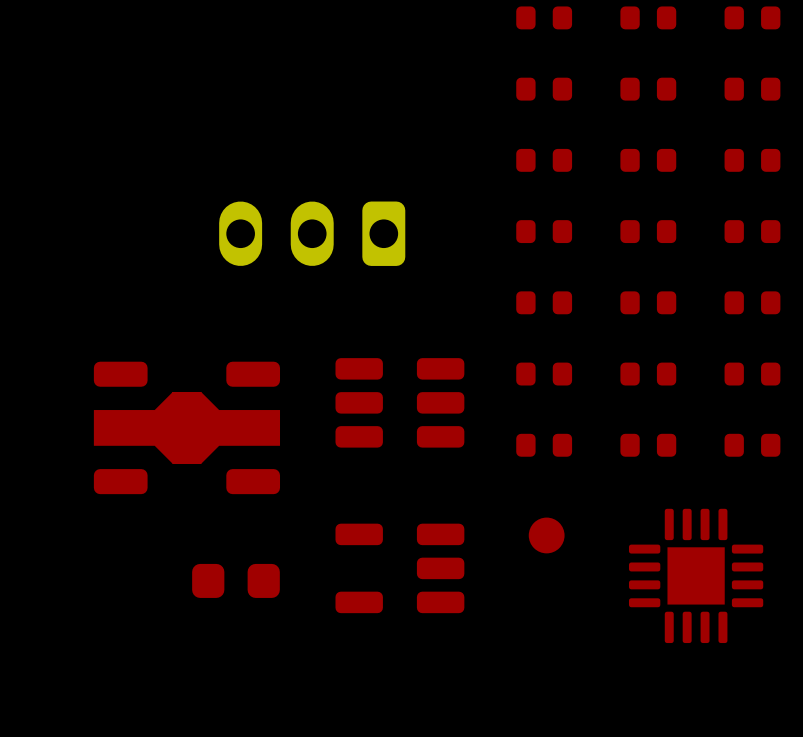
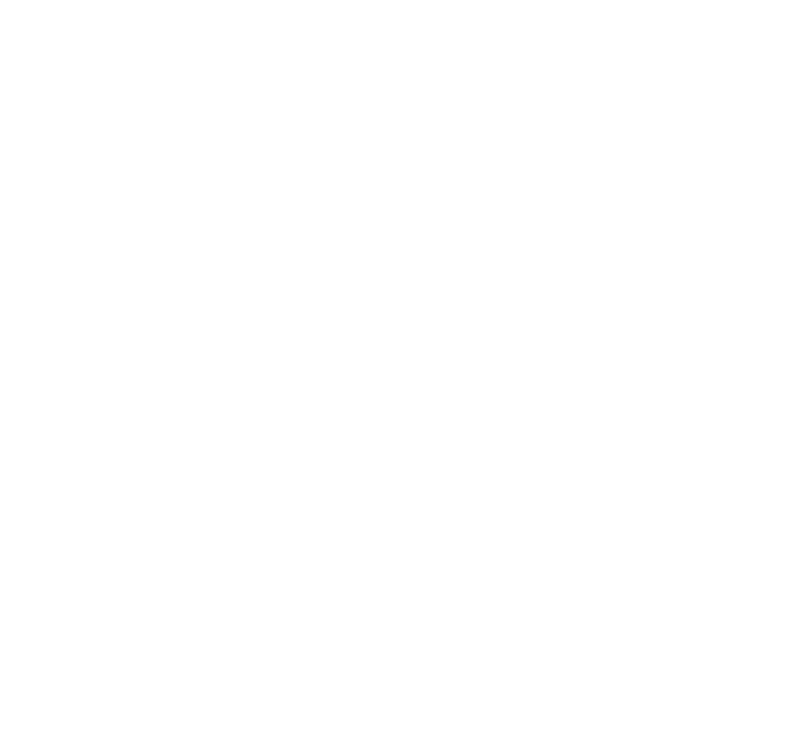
part: (544, 17) -> none
part: (648, 17) -> none
part: (752, 17) -> none
part: (544, 89) -> none
part: (648, 89) -> none
part: (752, 89) -> none
part: (544, 160) -> none
part: (648, 160) -> none
part: (752, 160) -> none
part: (544, 231) -> none
part: (648, 231) -> none
part: (752, 231) -> none
part: (312, 233) -> none
part: (544, 302) -> none
part: (648, 302) -> none
part: (752, 302) -> none
part: (544, 374) -> none
part: (648, 374) -> none
part: (752, 374) -> none
part: (399, 402) -> none
part: (186, 427) -> none
part: (544, 445) -> none
part: (648, 445) -> none
part: (752, 445) -> none
part: (546, 535) -> none
part: (399, 568) -> none
part: (696, 575) -> none
part: (235, 580) -> none

